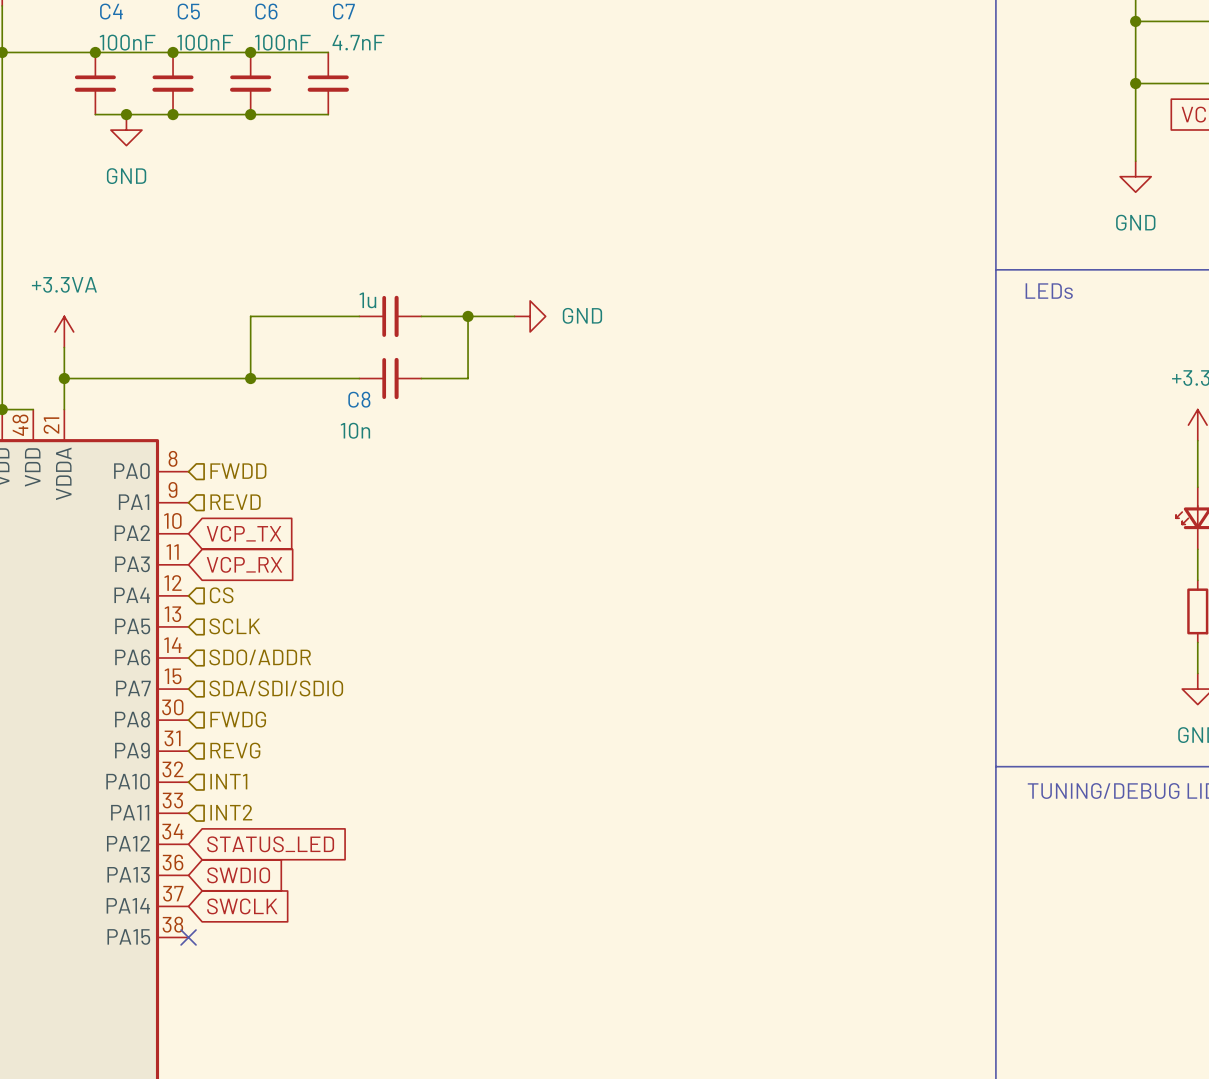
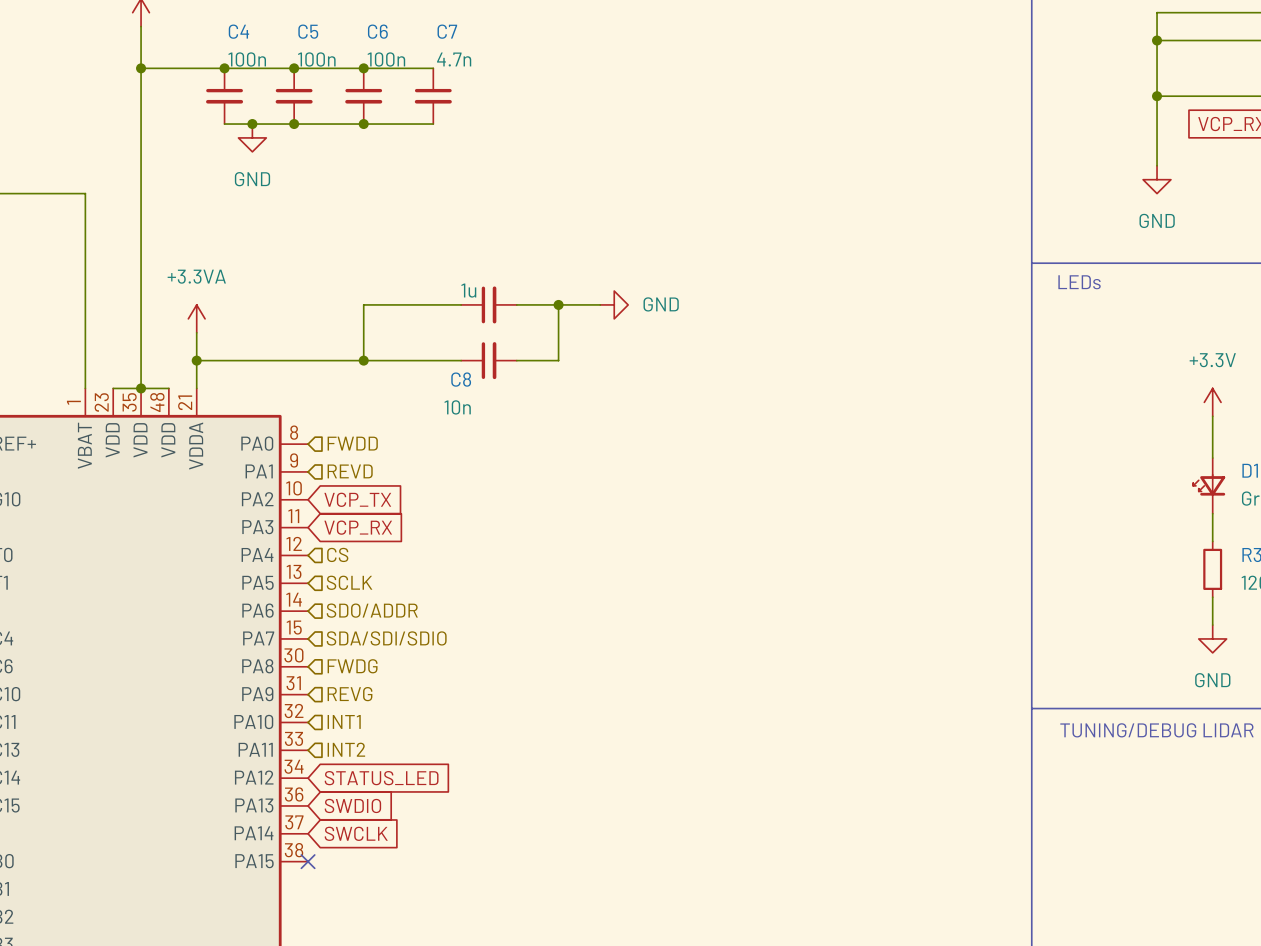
C4 value: 100nF (127, 42) -> 100n (247, 59)
C5 value: 100nF (205, 42) -> 100n (316, 59)
C6 value: 100nF (282, 42) -> 100n (386, 59)
C7 value: 4.7nF (358, 42) -> 4.7n (454, 59)

